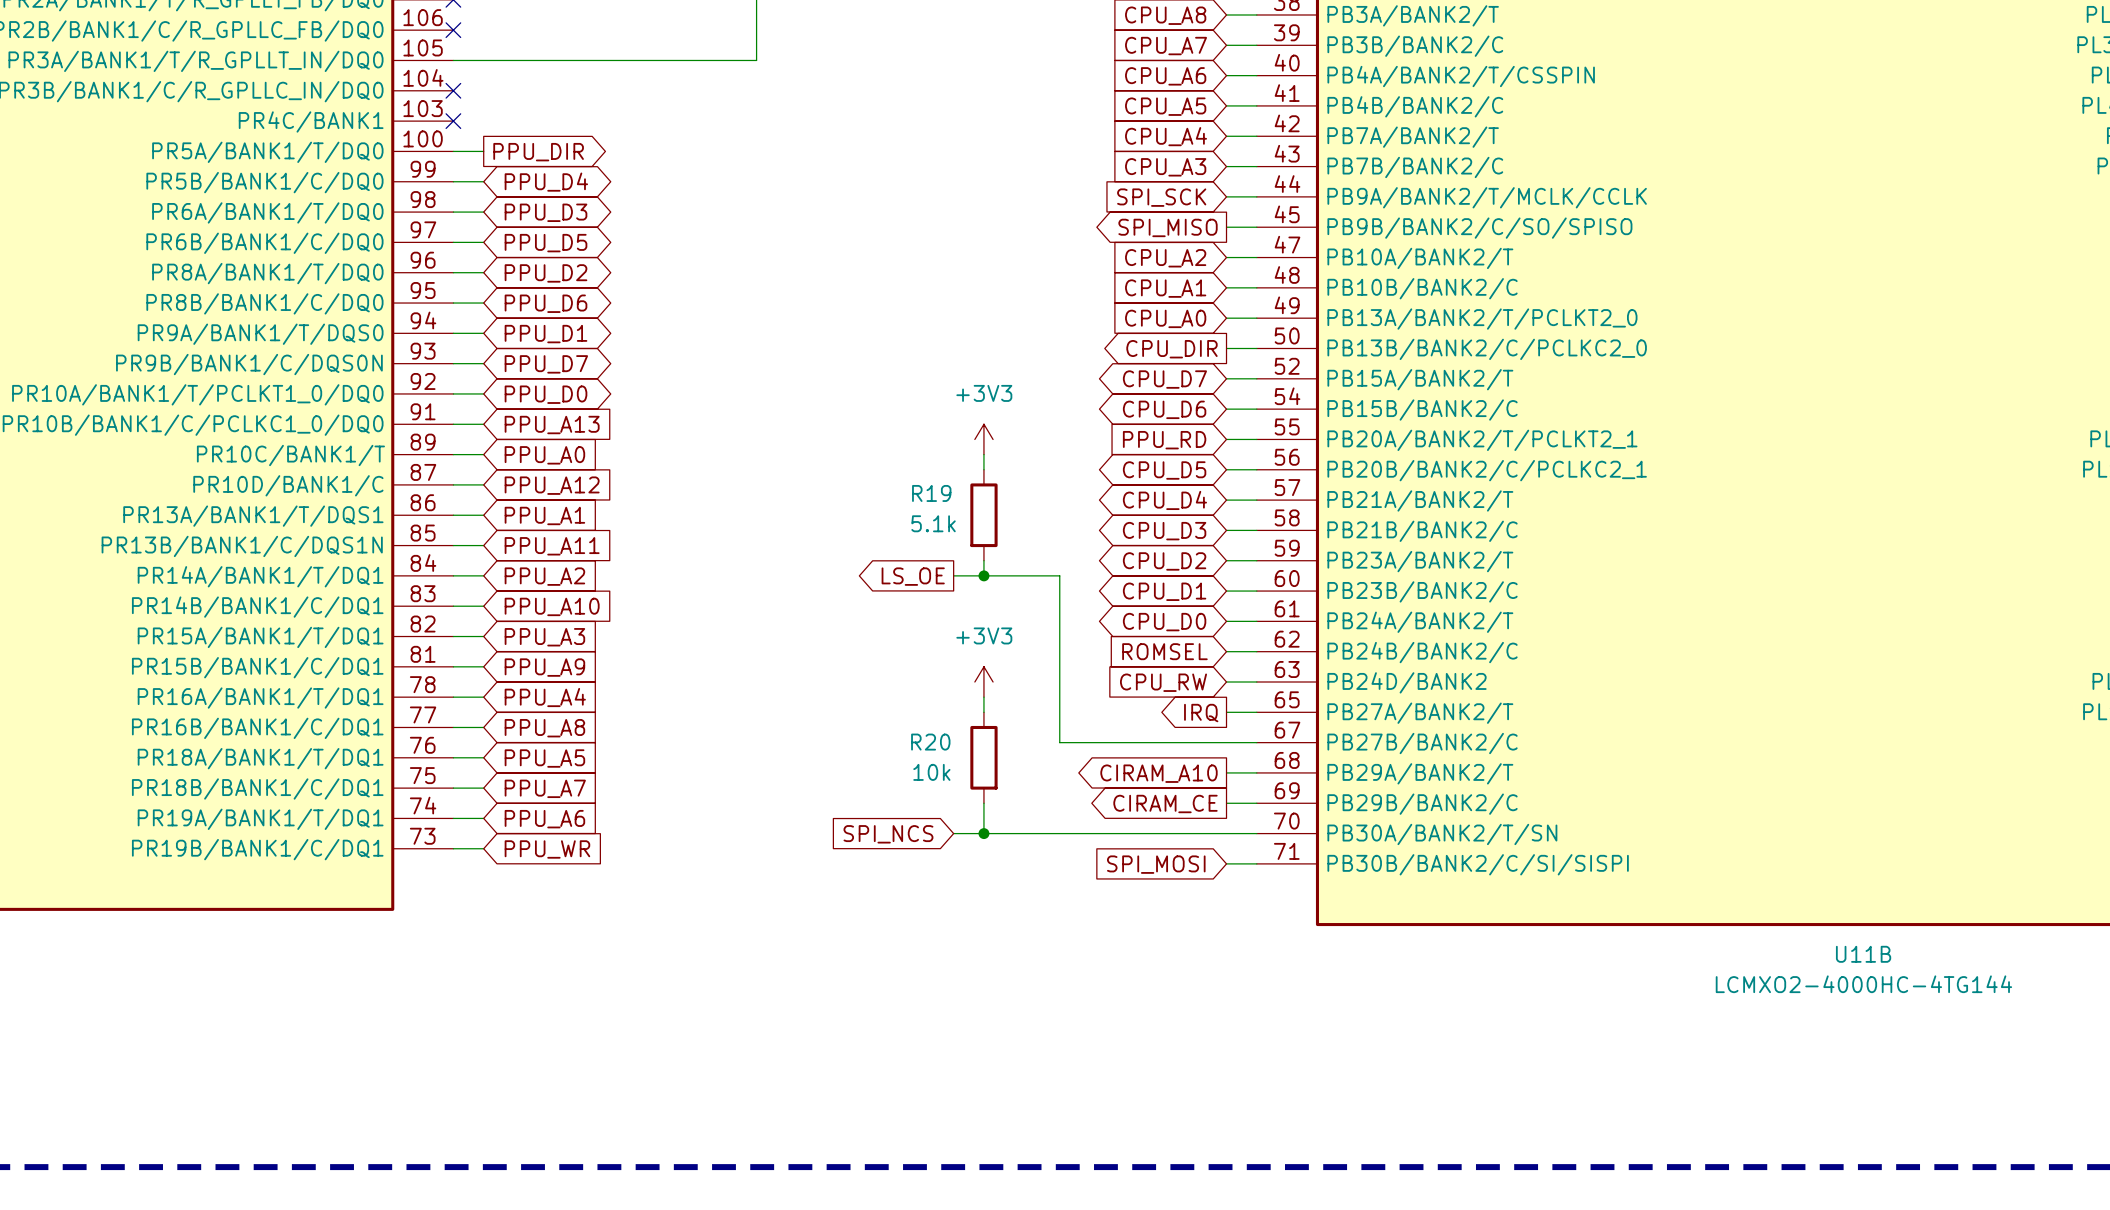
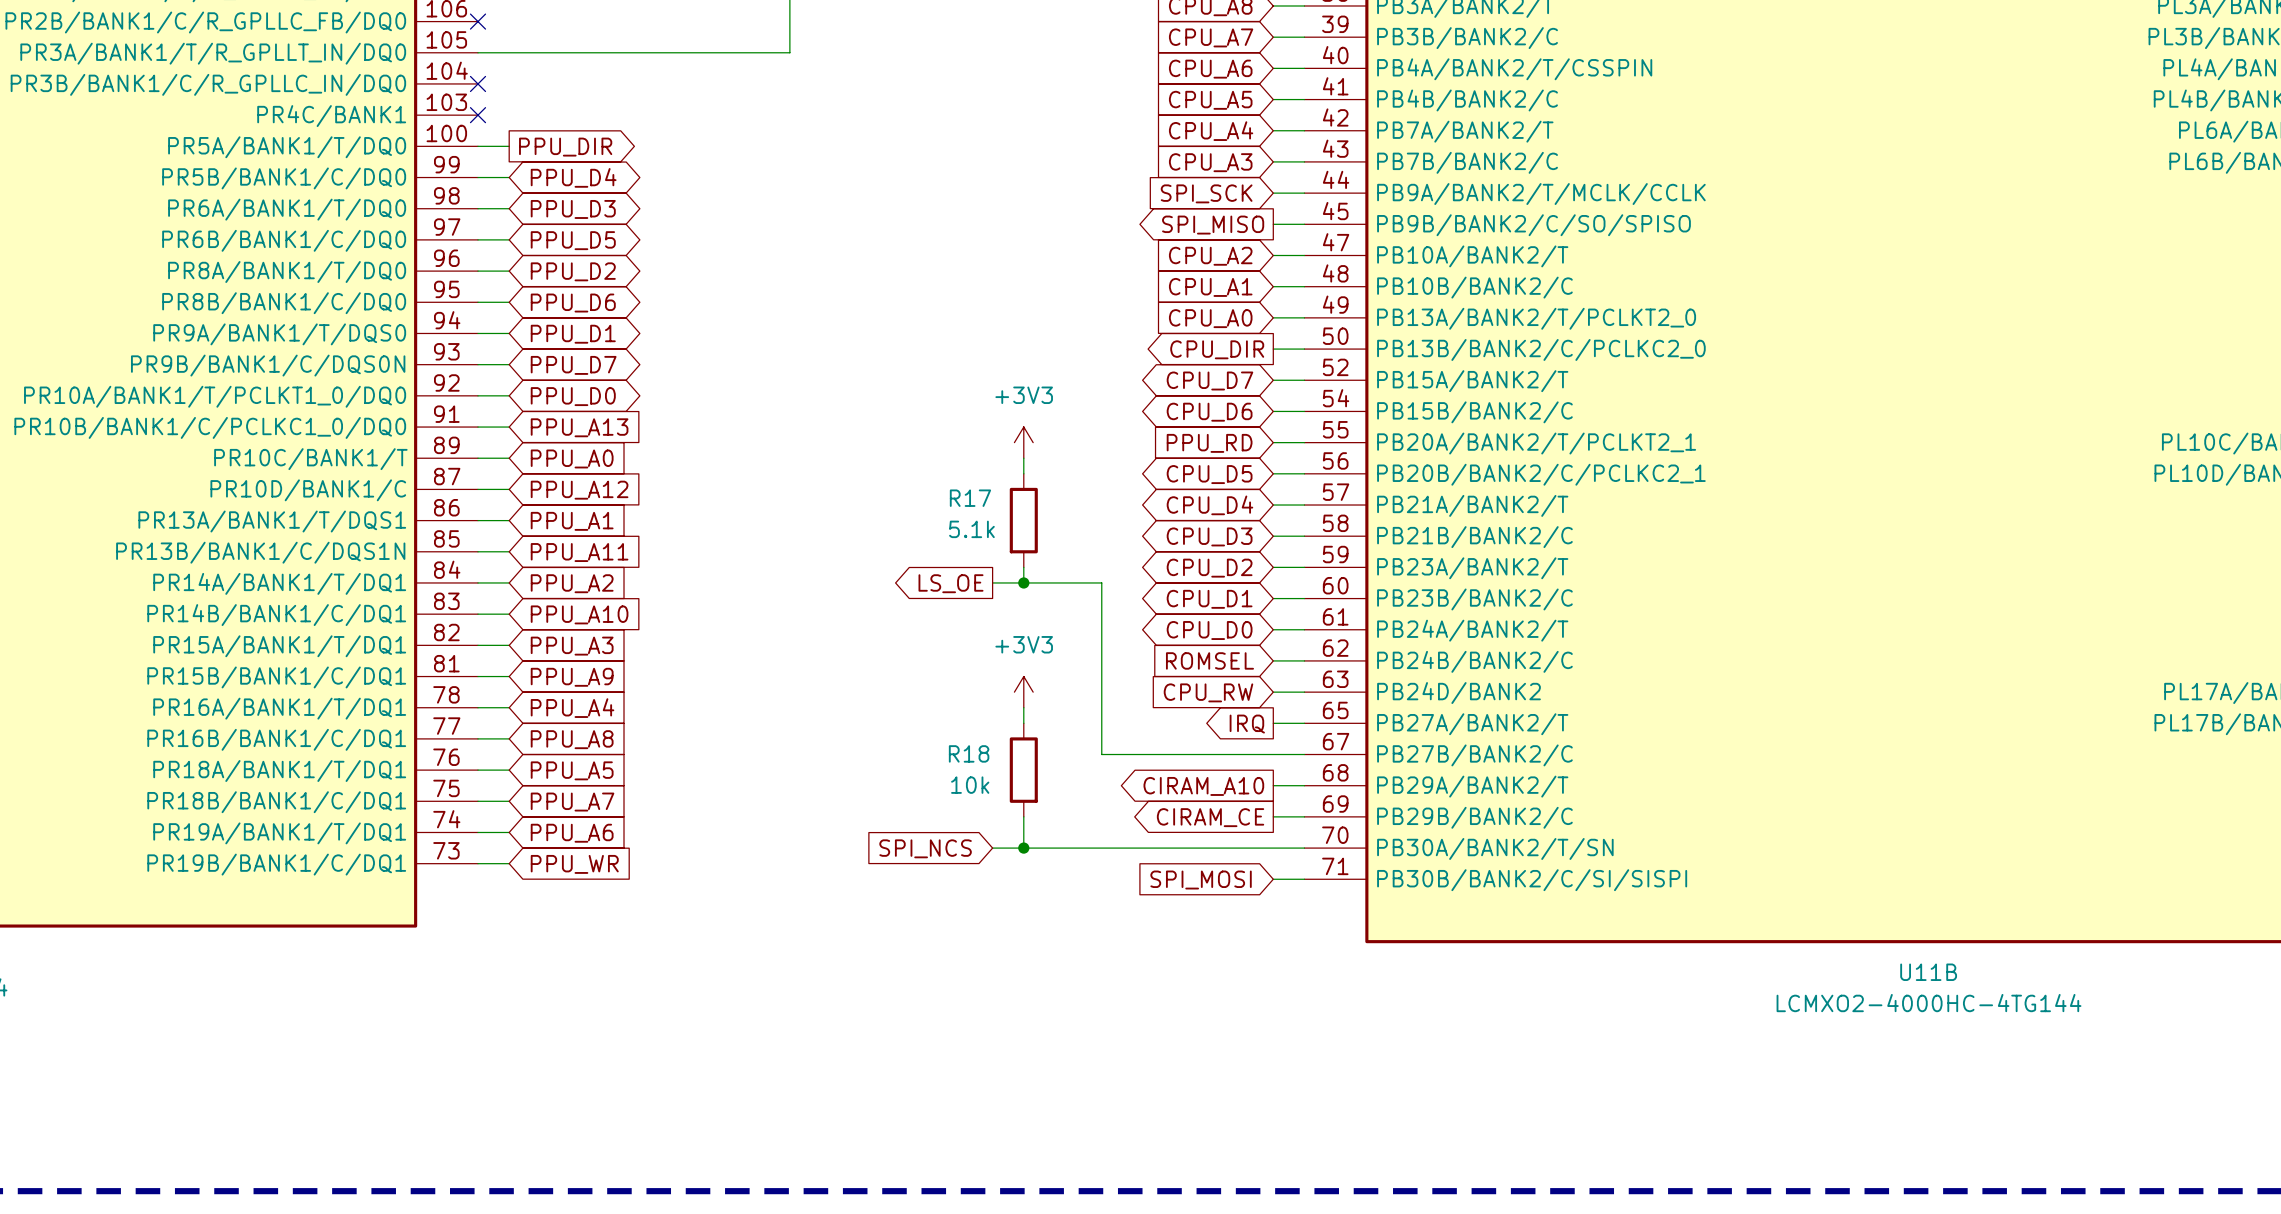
R19 name: R19 (931, 493) -> R17 (970, 498)
R20 name: R20 (930, 742) -> R18 (969, 753)

